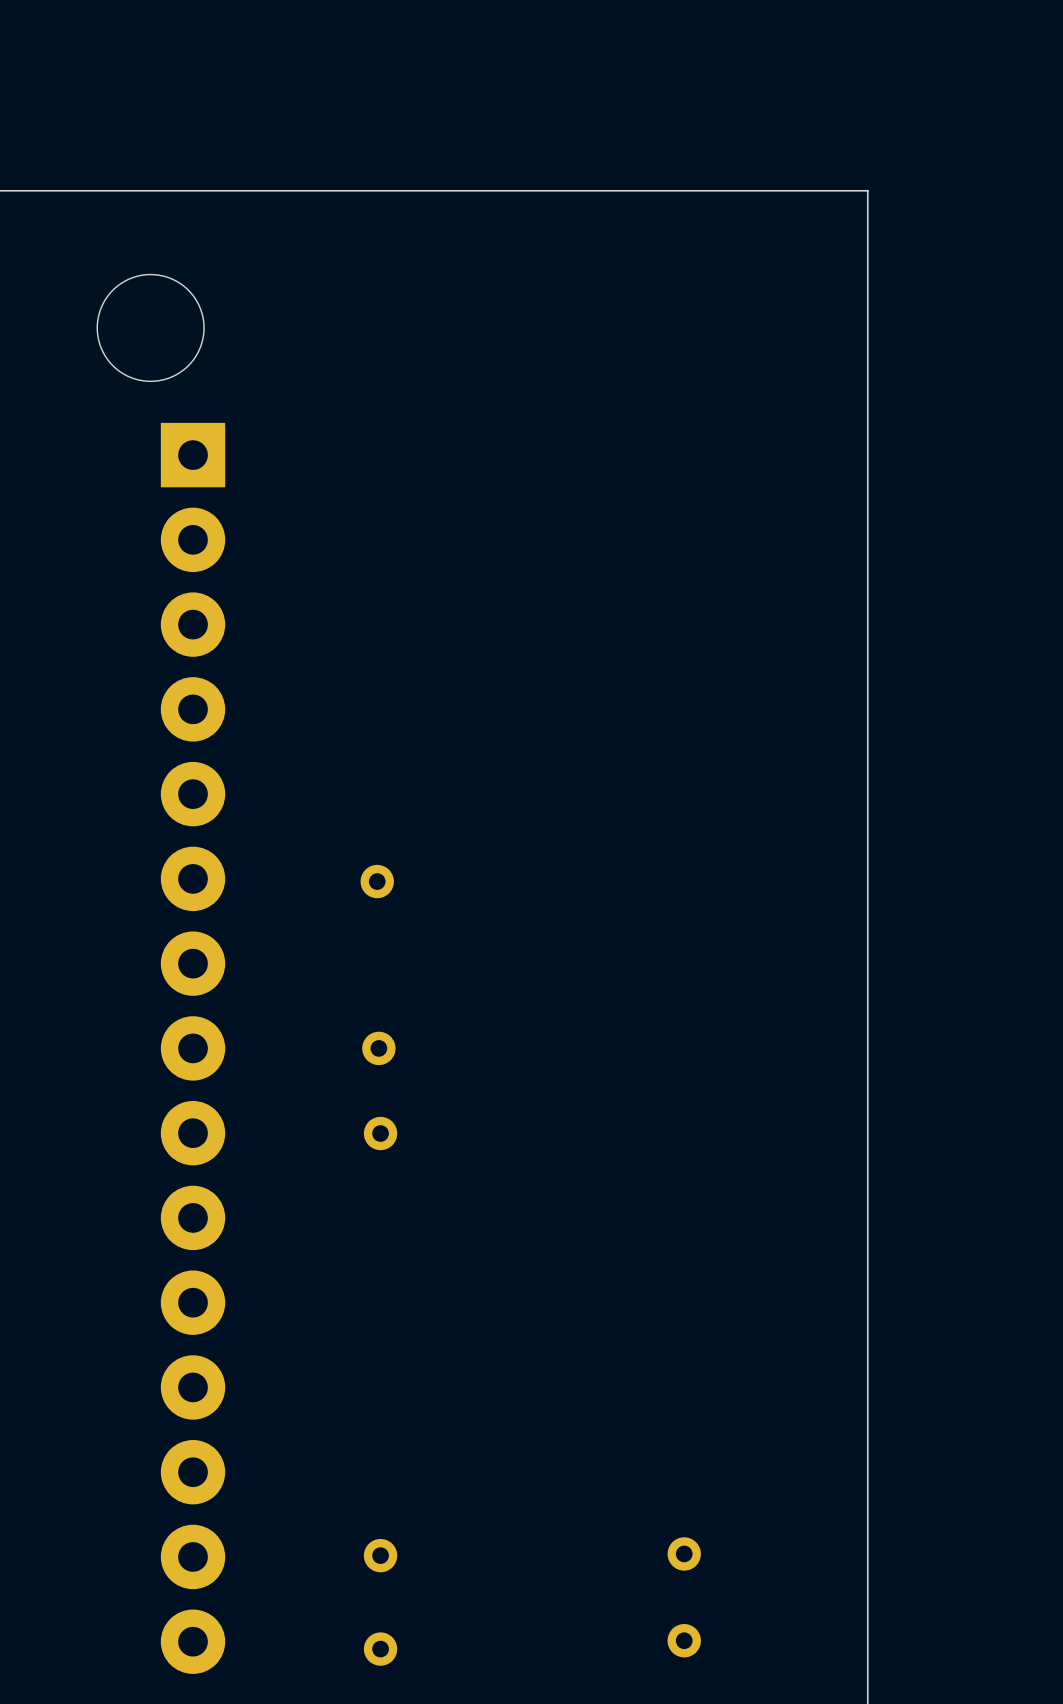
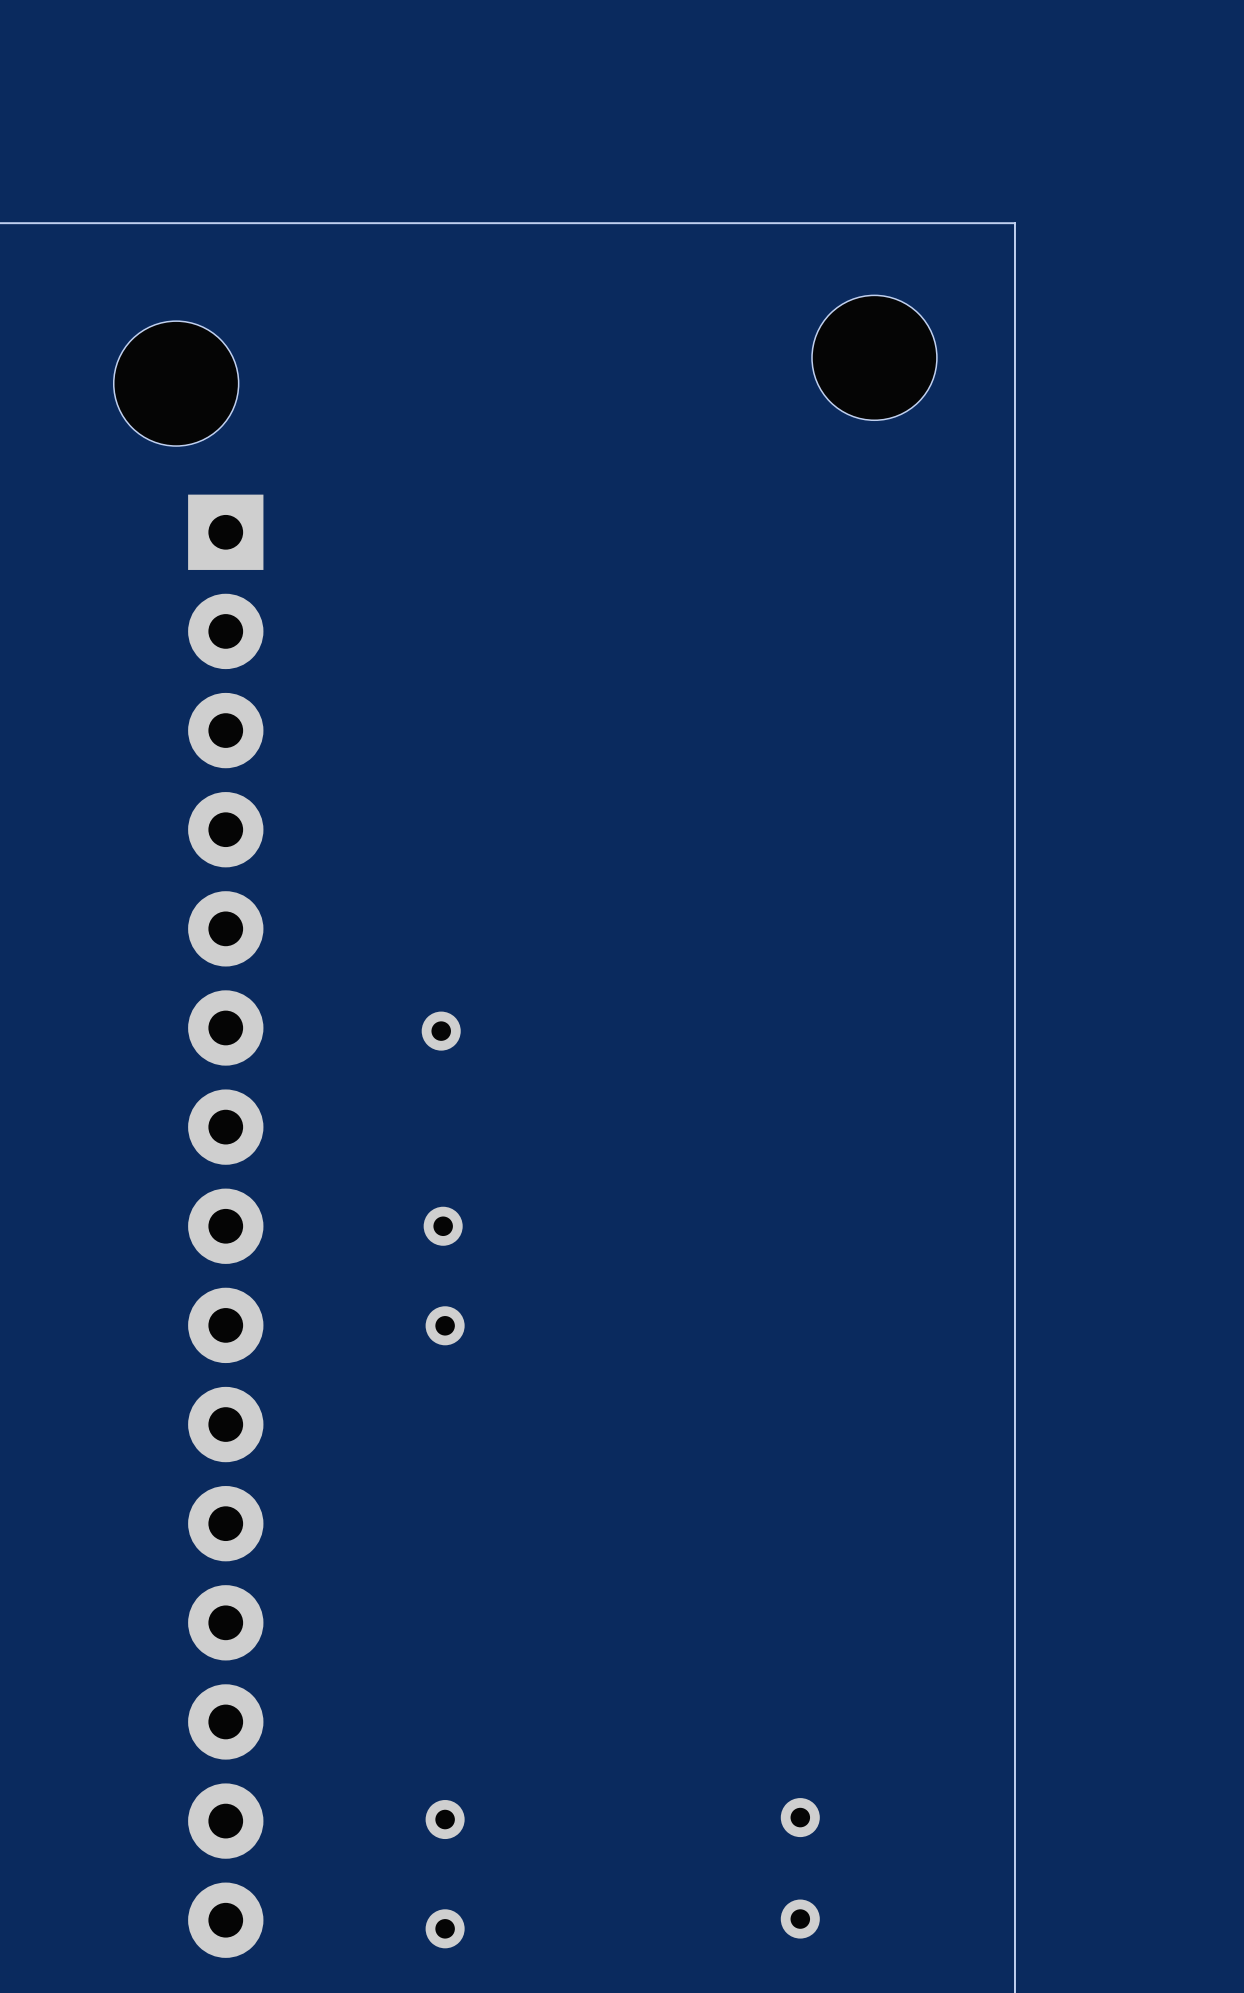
part: none -> (874, 357)

